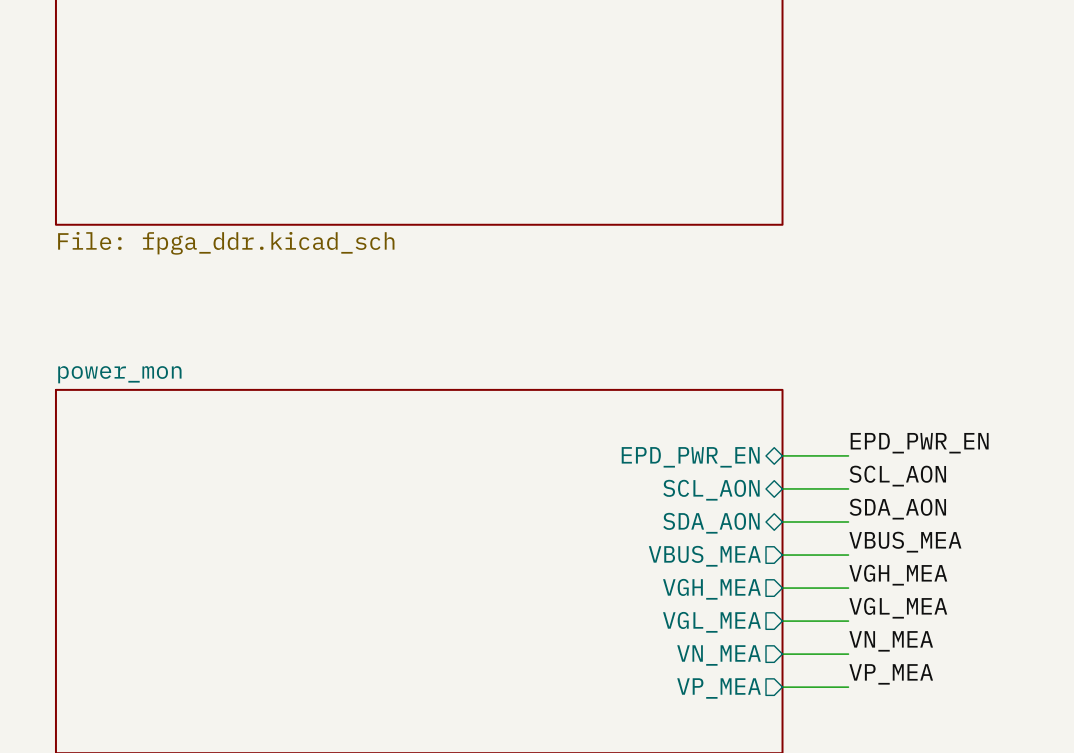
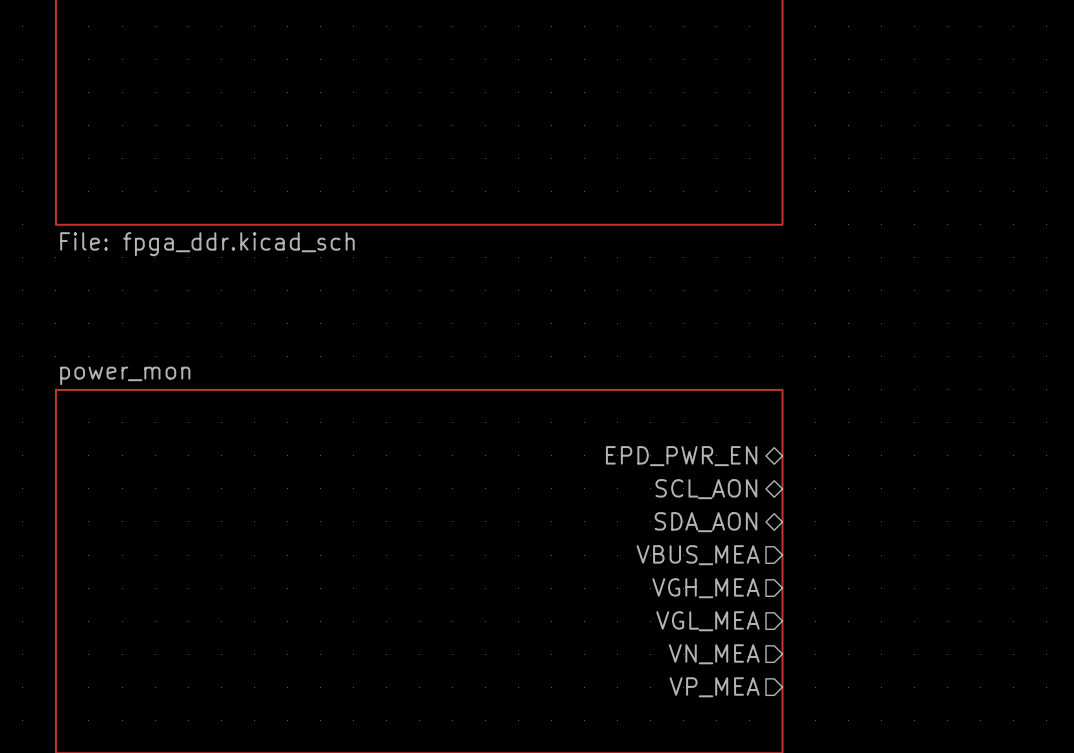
label: EPD_PWR_EN (919, 443) -> none
wire: (782, 455) (848, 455) -> none
label: SCL_AON (897, 476) -> none
wire: (782, 488) (848, 488) -> none
label: SDA_AON (897, 509) -> none
wire: (782, 521) (848, 521) -> none
label: VBUS_MEA (905, 542) -> none
wire: (782, 555) (848, 555) -> none
label: VGH_MEA (898, 575) -> none
wire: (782, 588) (848, 588) -> none
label: VGL_MEA (898, 608) -> none
wire: (782, 621) (848, 621) -> none
label: VN_MEA (891, 641) -> none
wire: (782, 654) (848, 654) -> none
label: VP_MEA (891, 674) -> none
wire: (782, 687) (848, 687) -> none

